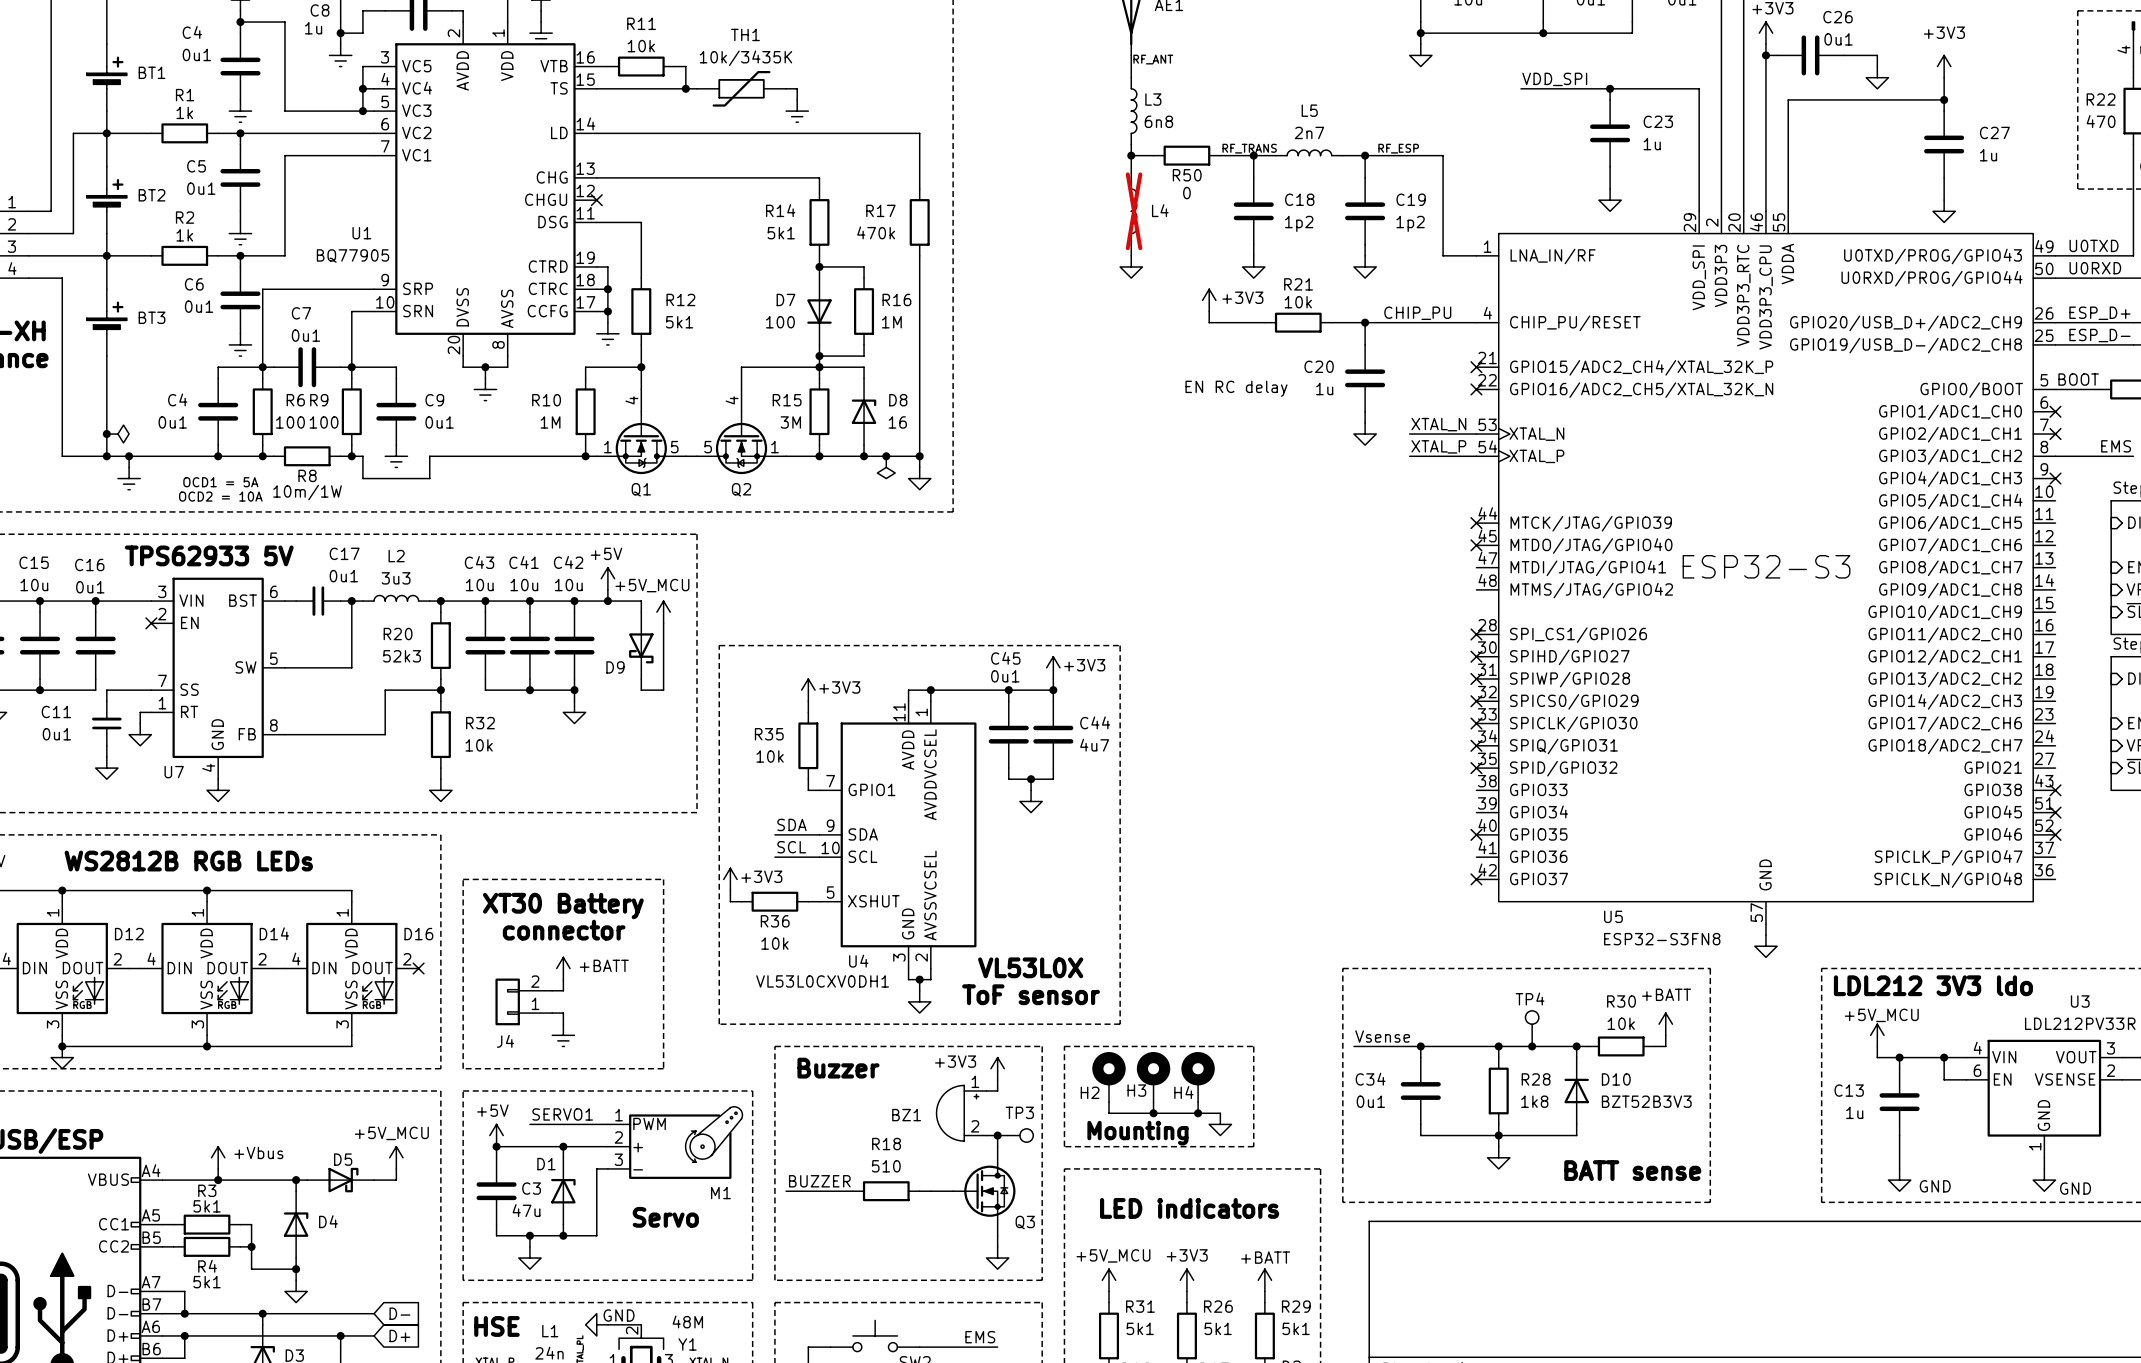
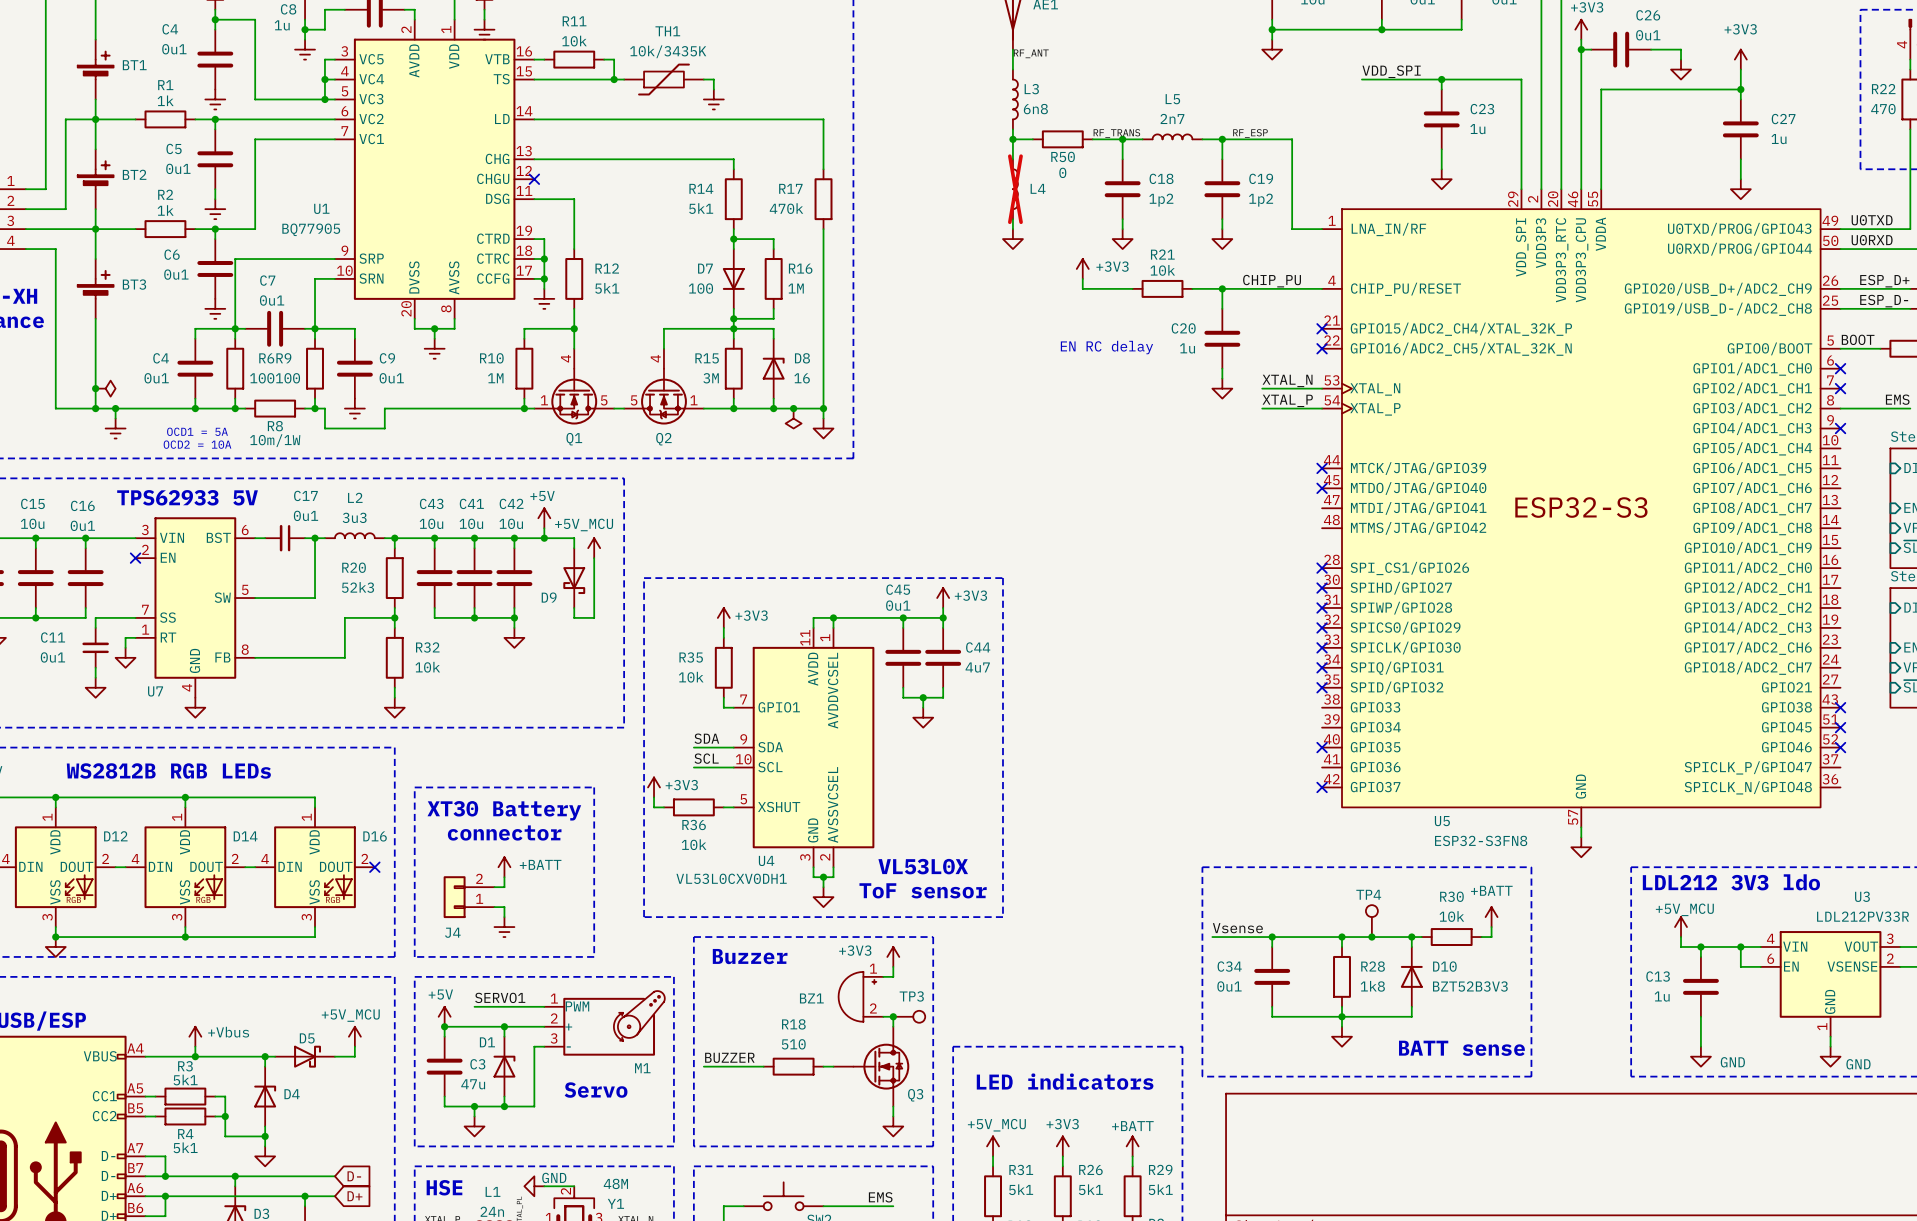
line: (1064, 1046) (1253, 1046) (1253, 1146) (1064, 1146) (1064, 1046) -> none
H2: (1108, 1077) -> none
H3: (1153, 1077) -> none
H4: (1198, 1077) -> none
wire: (1108, 1102) (1108, 1113) (1220, 1113) -> none
wire: (1153, 1102) (1153, 1113) -> none
wire: (1198, 1102) (1198, 1113) -> none
junction: (1153, 1113) -> none
junction: (1198, 1113) -> none
power symbol: (1220, 1124) -> none
text: Mounting (1137, 1133) -> none

